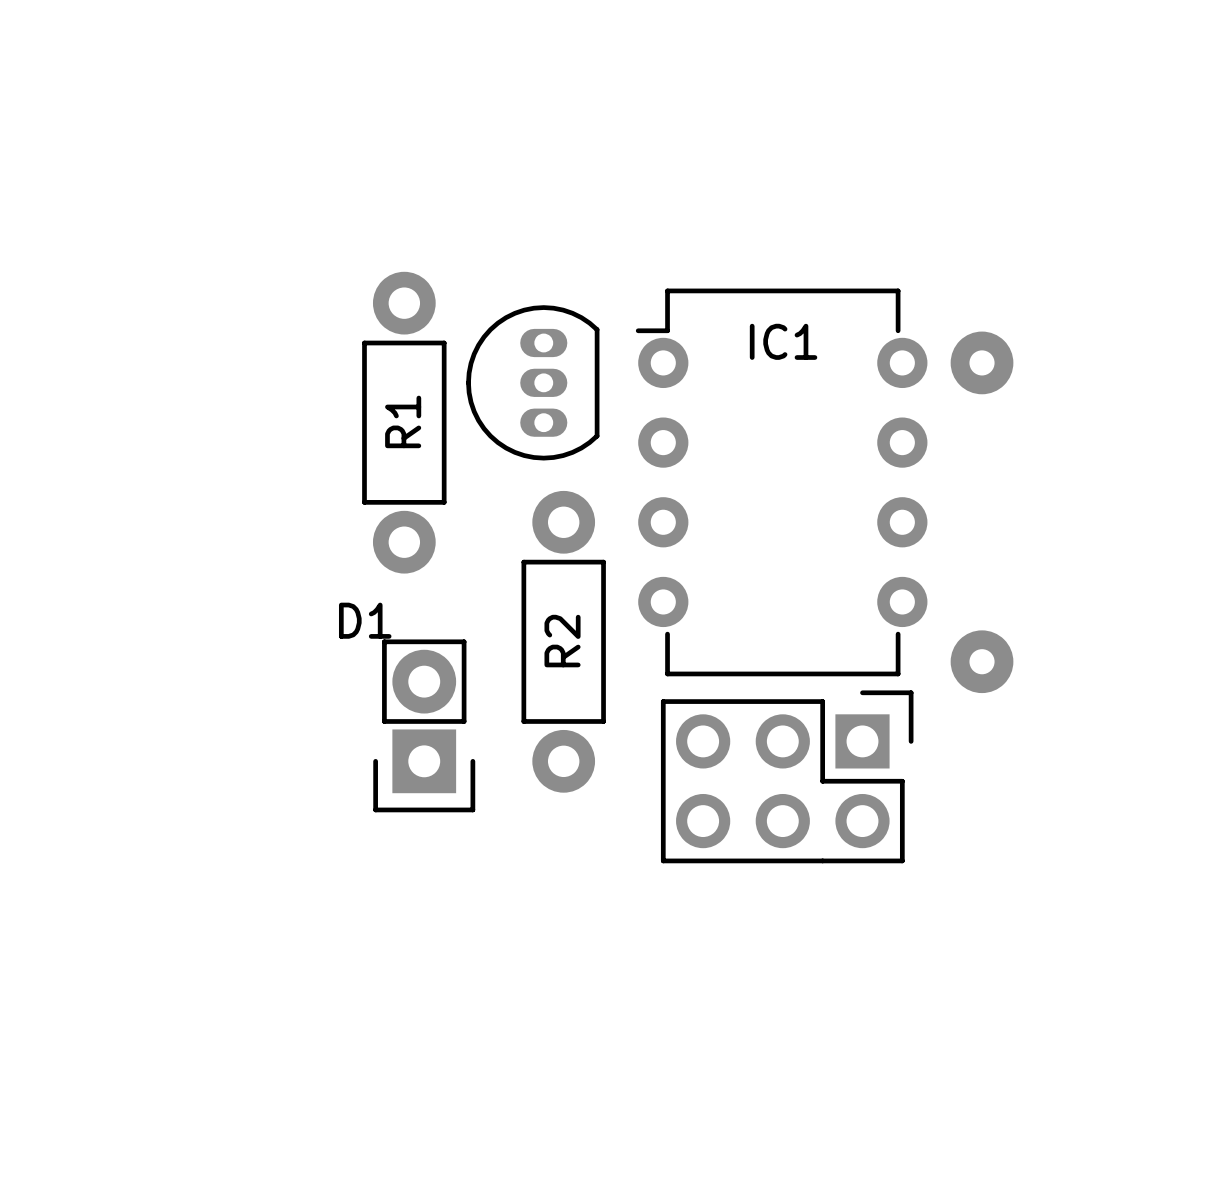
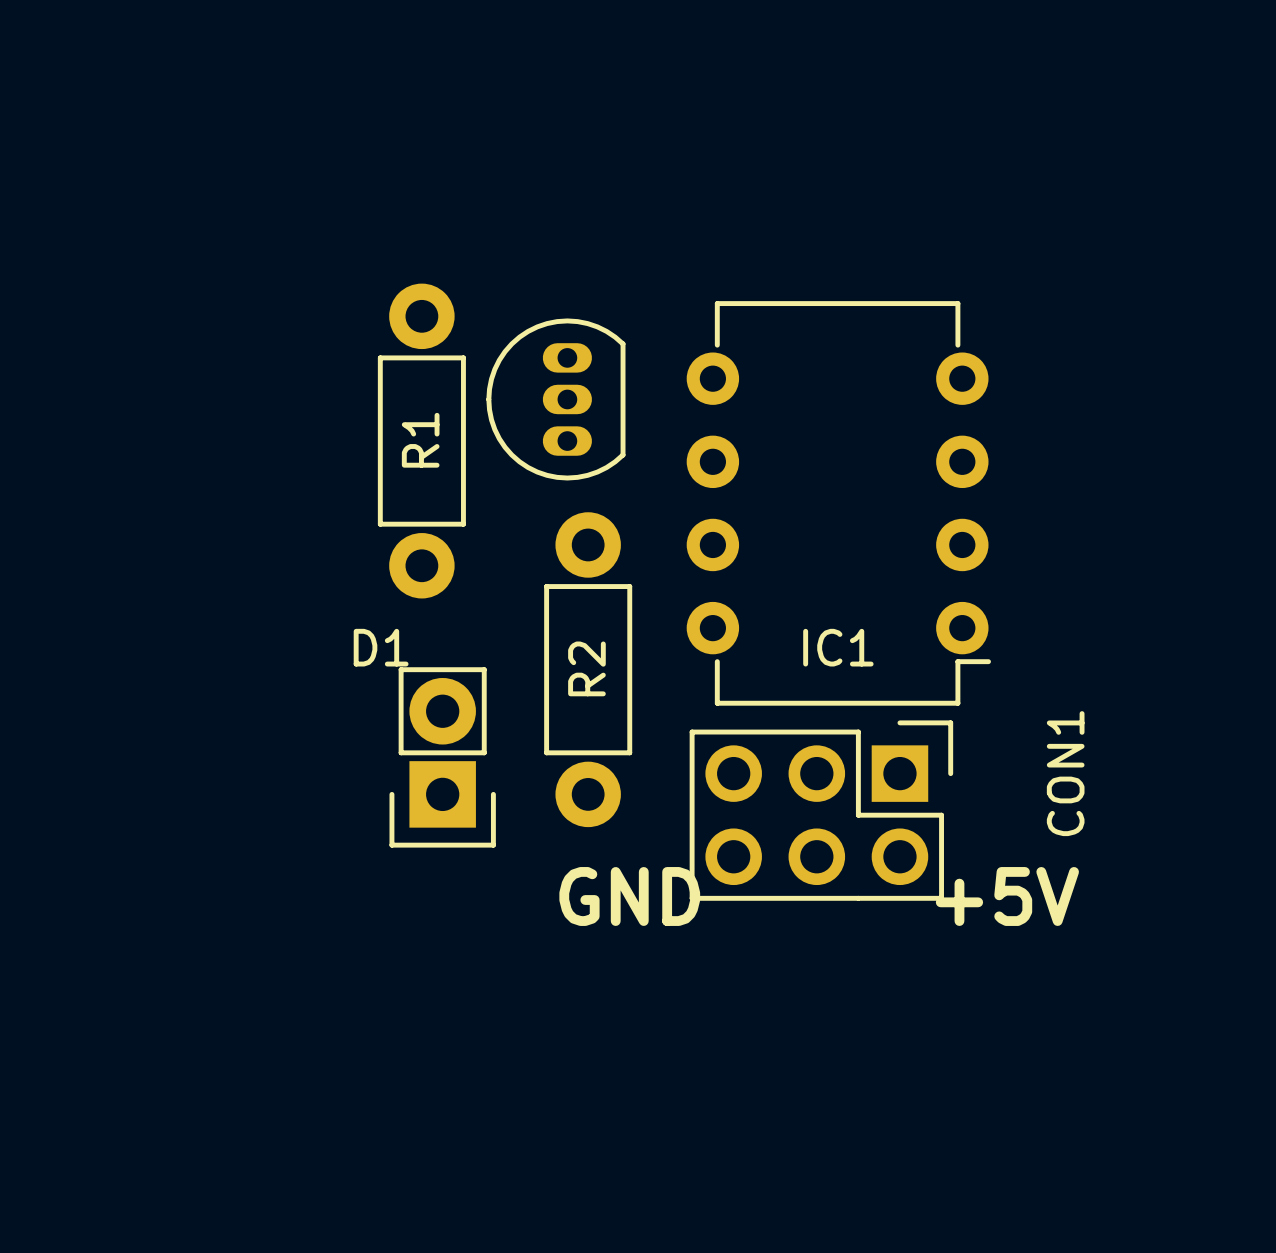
part: (982, 362) -> none
IC1 rotation: 0° (781, 482) -> 180° (838, 503)
part: (982, 661) -> none
CON1 name: none -> CON1 (1065, 773)
text: none -> GND (629, 896)
text: none -> +5V (1007, 896)

